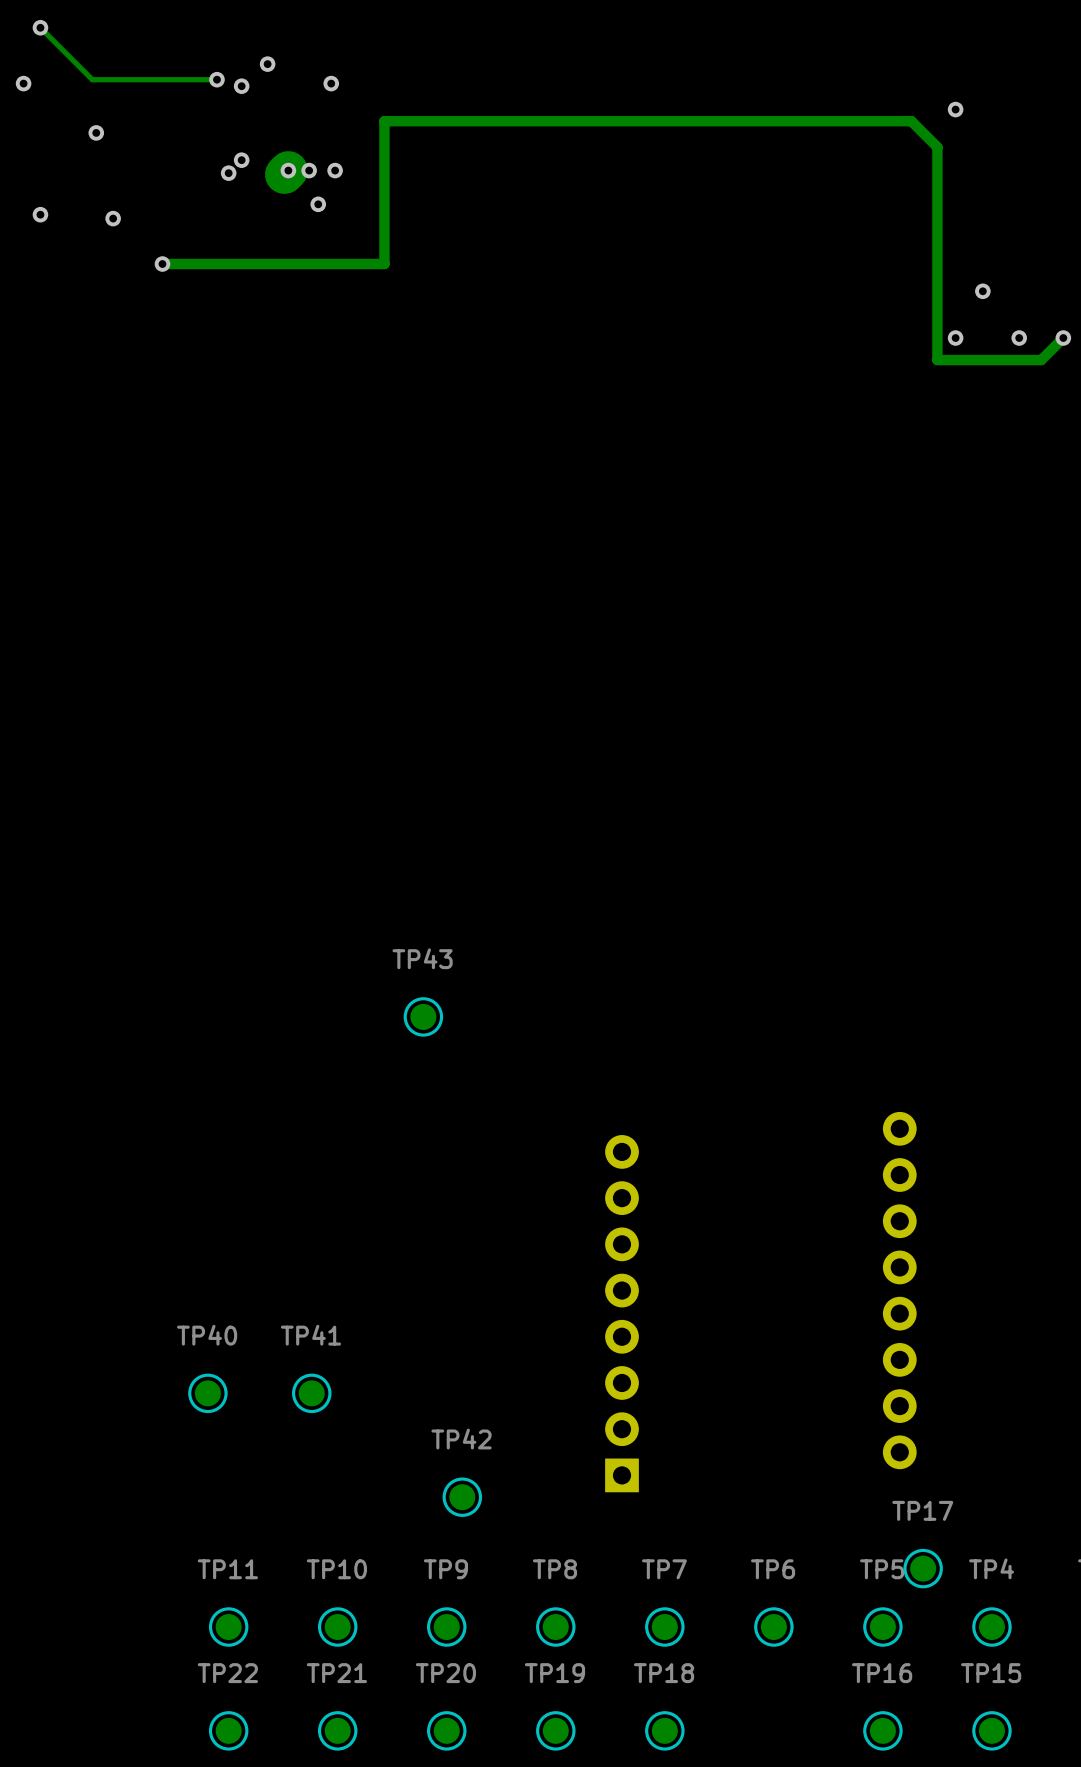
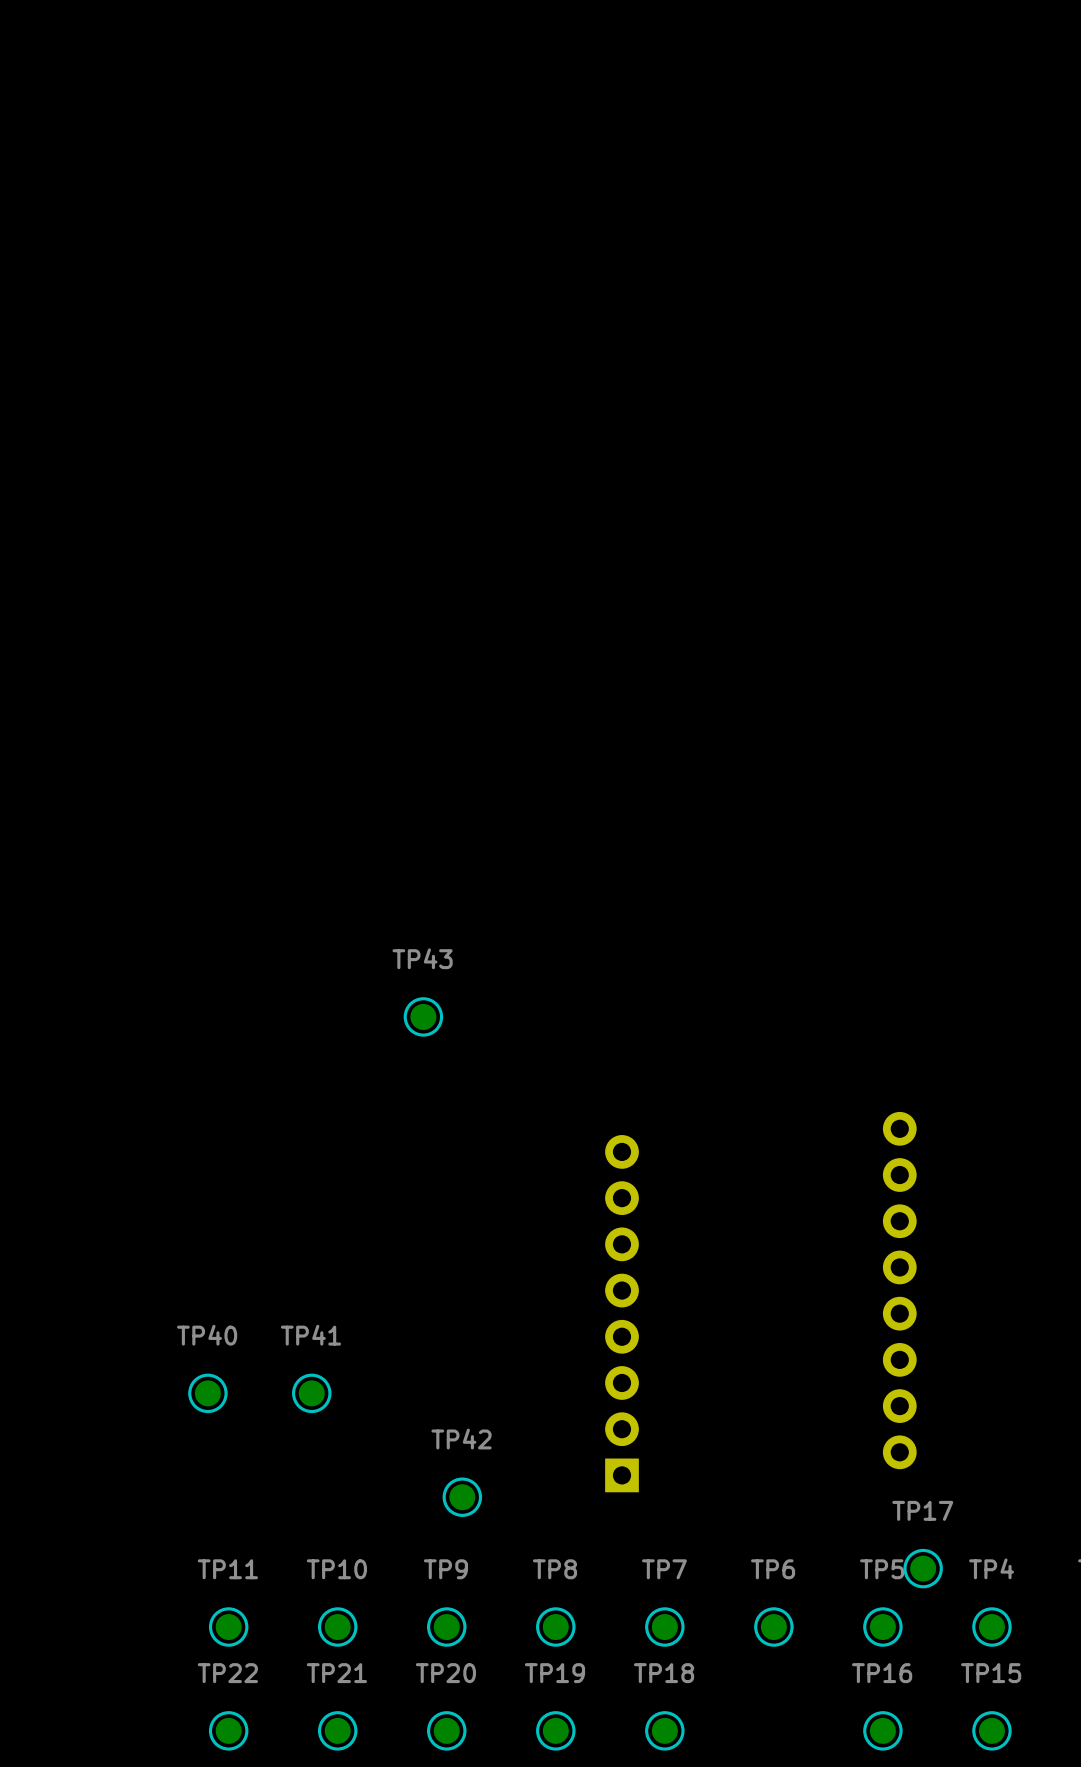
track: (40, 27) (92, 79) (216, 79) -> none
via: (40, 27) -> none
via: (267, 64) -> none
via: (216, 79) -> none
via: (23, 83) -> none
via: (331, 83) -> none
via: (241, 86) -> none
via: (955, 109) -> none
via: (96, 132) -> none
via: (241, 160) -> none
track: (288, 170) (284, 174) -> none
via: (288, 170) -> none
via: (309, 170) -> none
via: (335, 170) -> none
via: (228, 173) -> none
via: (318, 204) -> none
via: (40, 214) -> none
via: (113, 218) -> none
track: (162, 264) (384, 264) (384, 121) (911, 121) (937, 147) (937, 360) (1041, 360) (1063, 338) -> none
via: (162, 264) -> none
via: (982, 291) -> none
via: (955, 338) -> none
via: (1019, 338) -> none
via: (1063, 338) -> none

